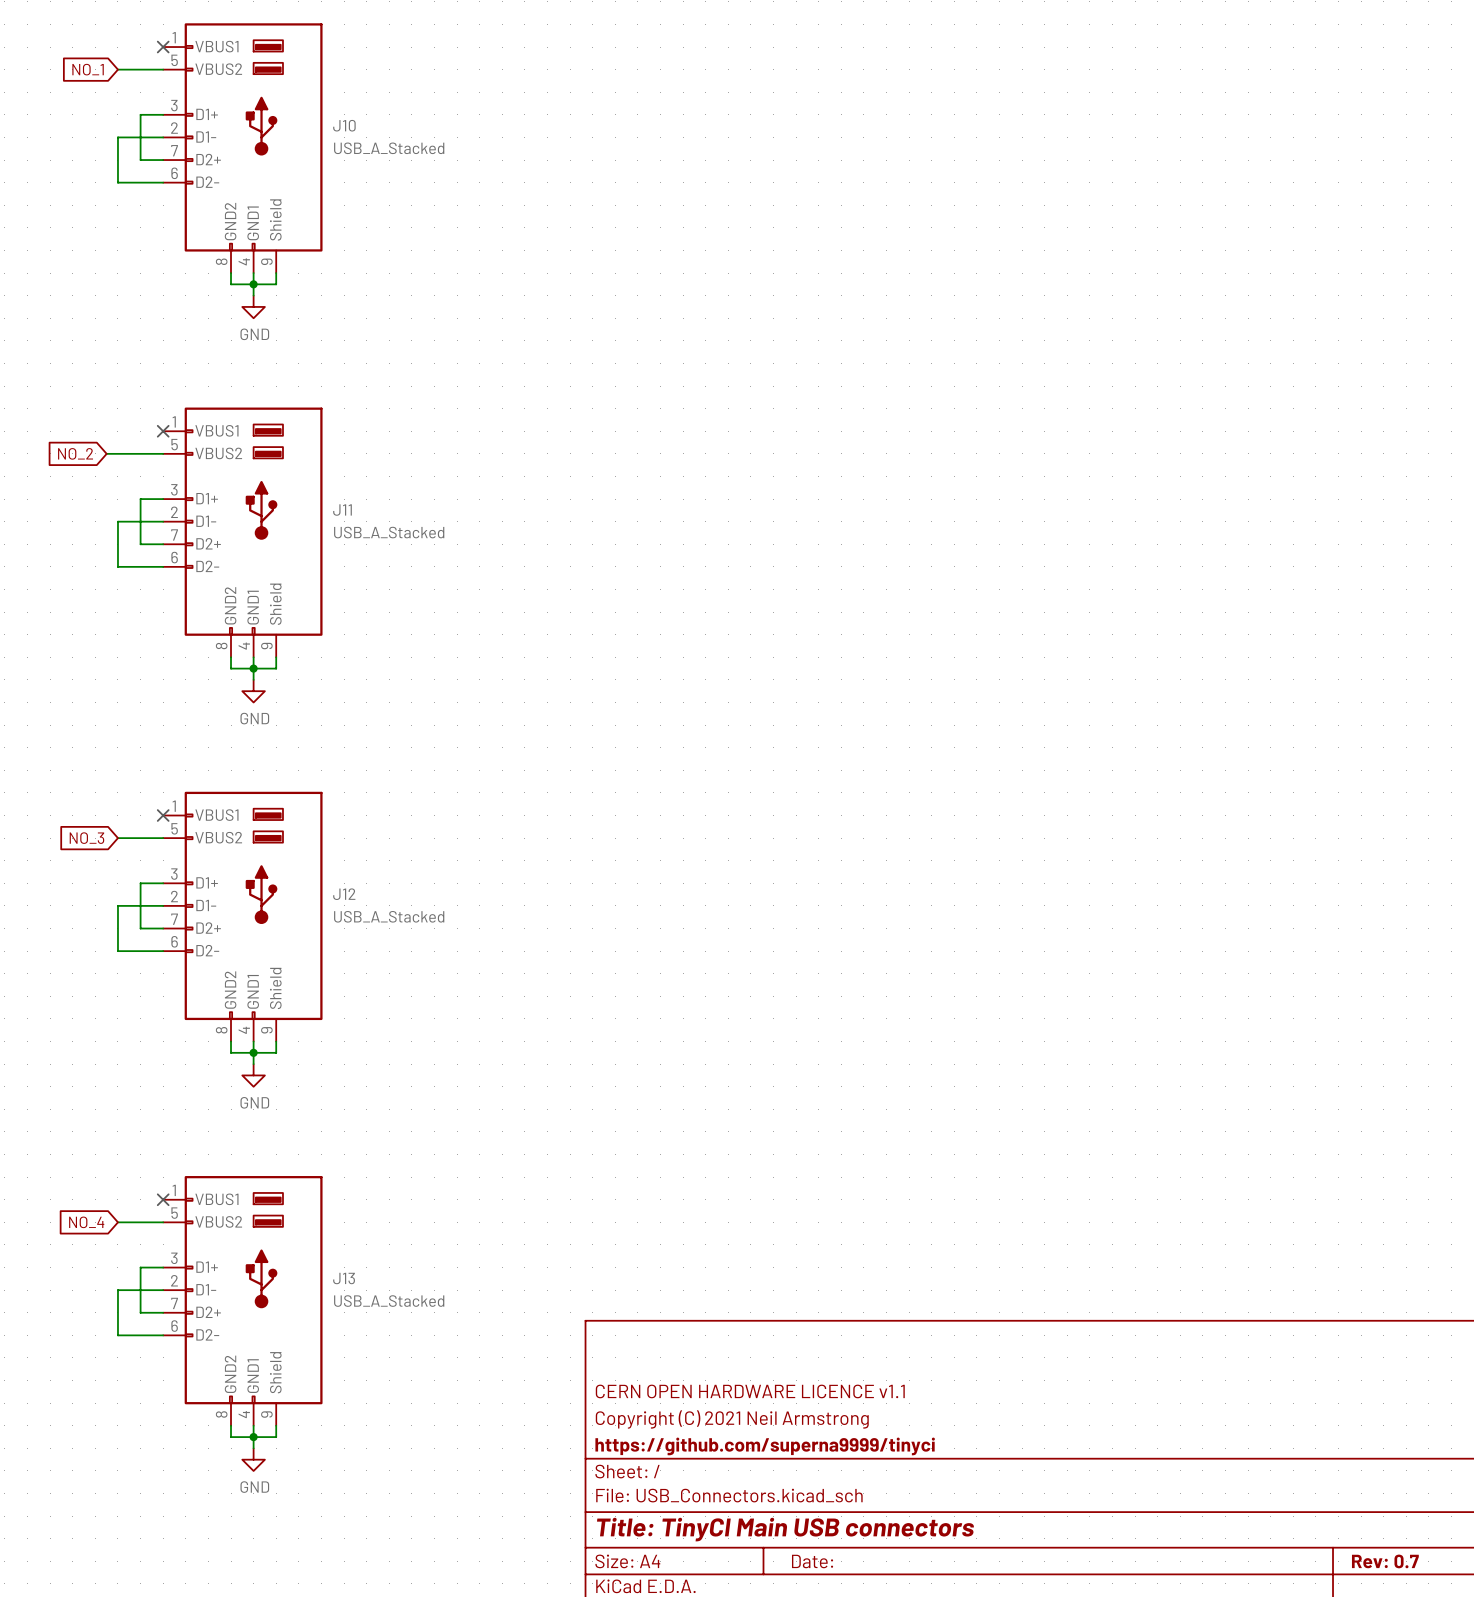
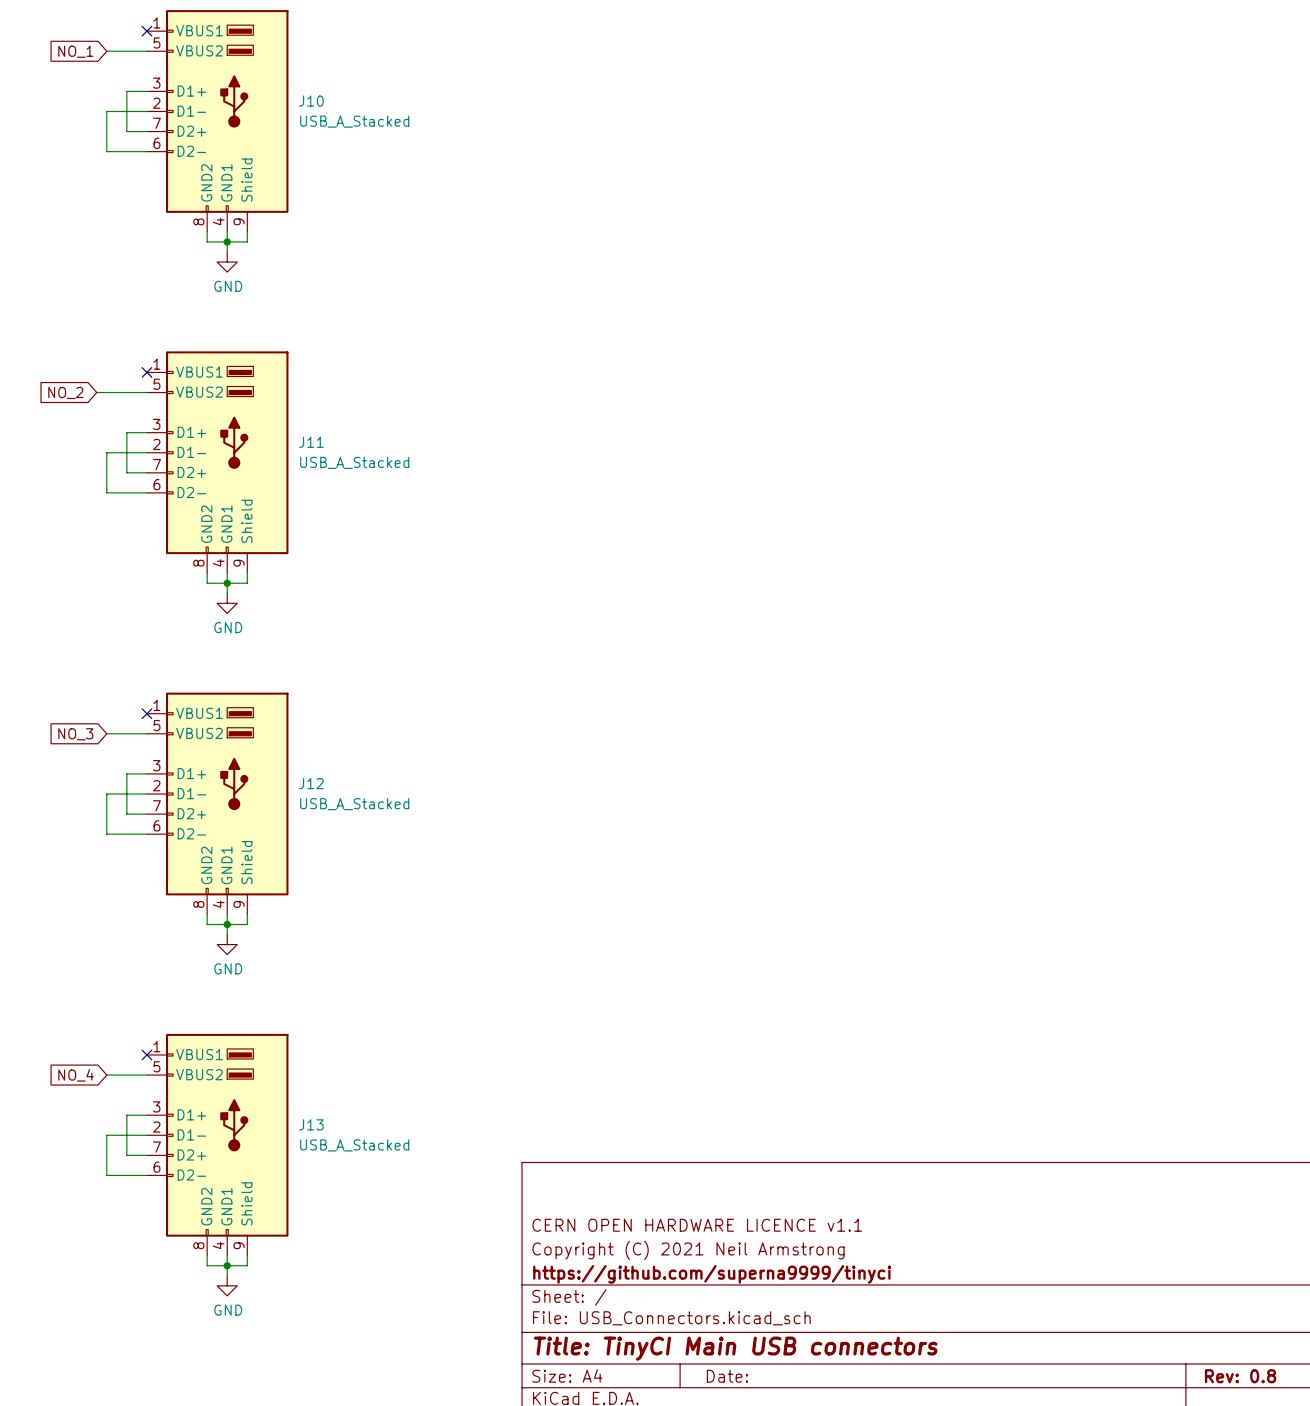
title block: Rev: 0.7 (1385, 1561) -> Rev: 0.8 (1240, 1376)

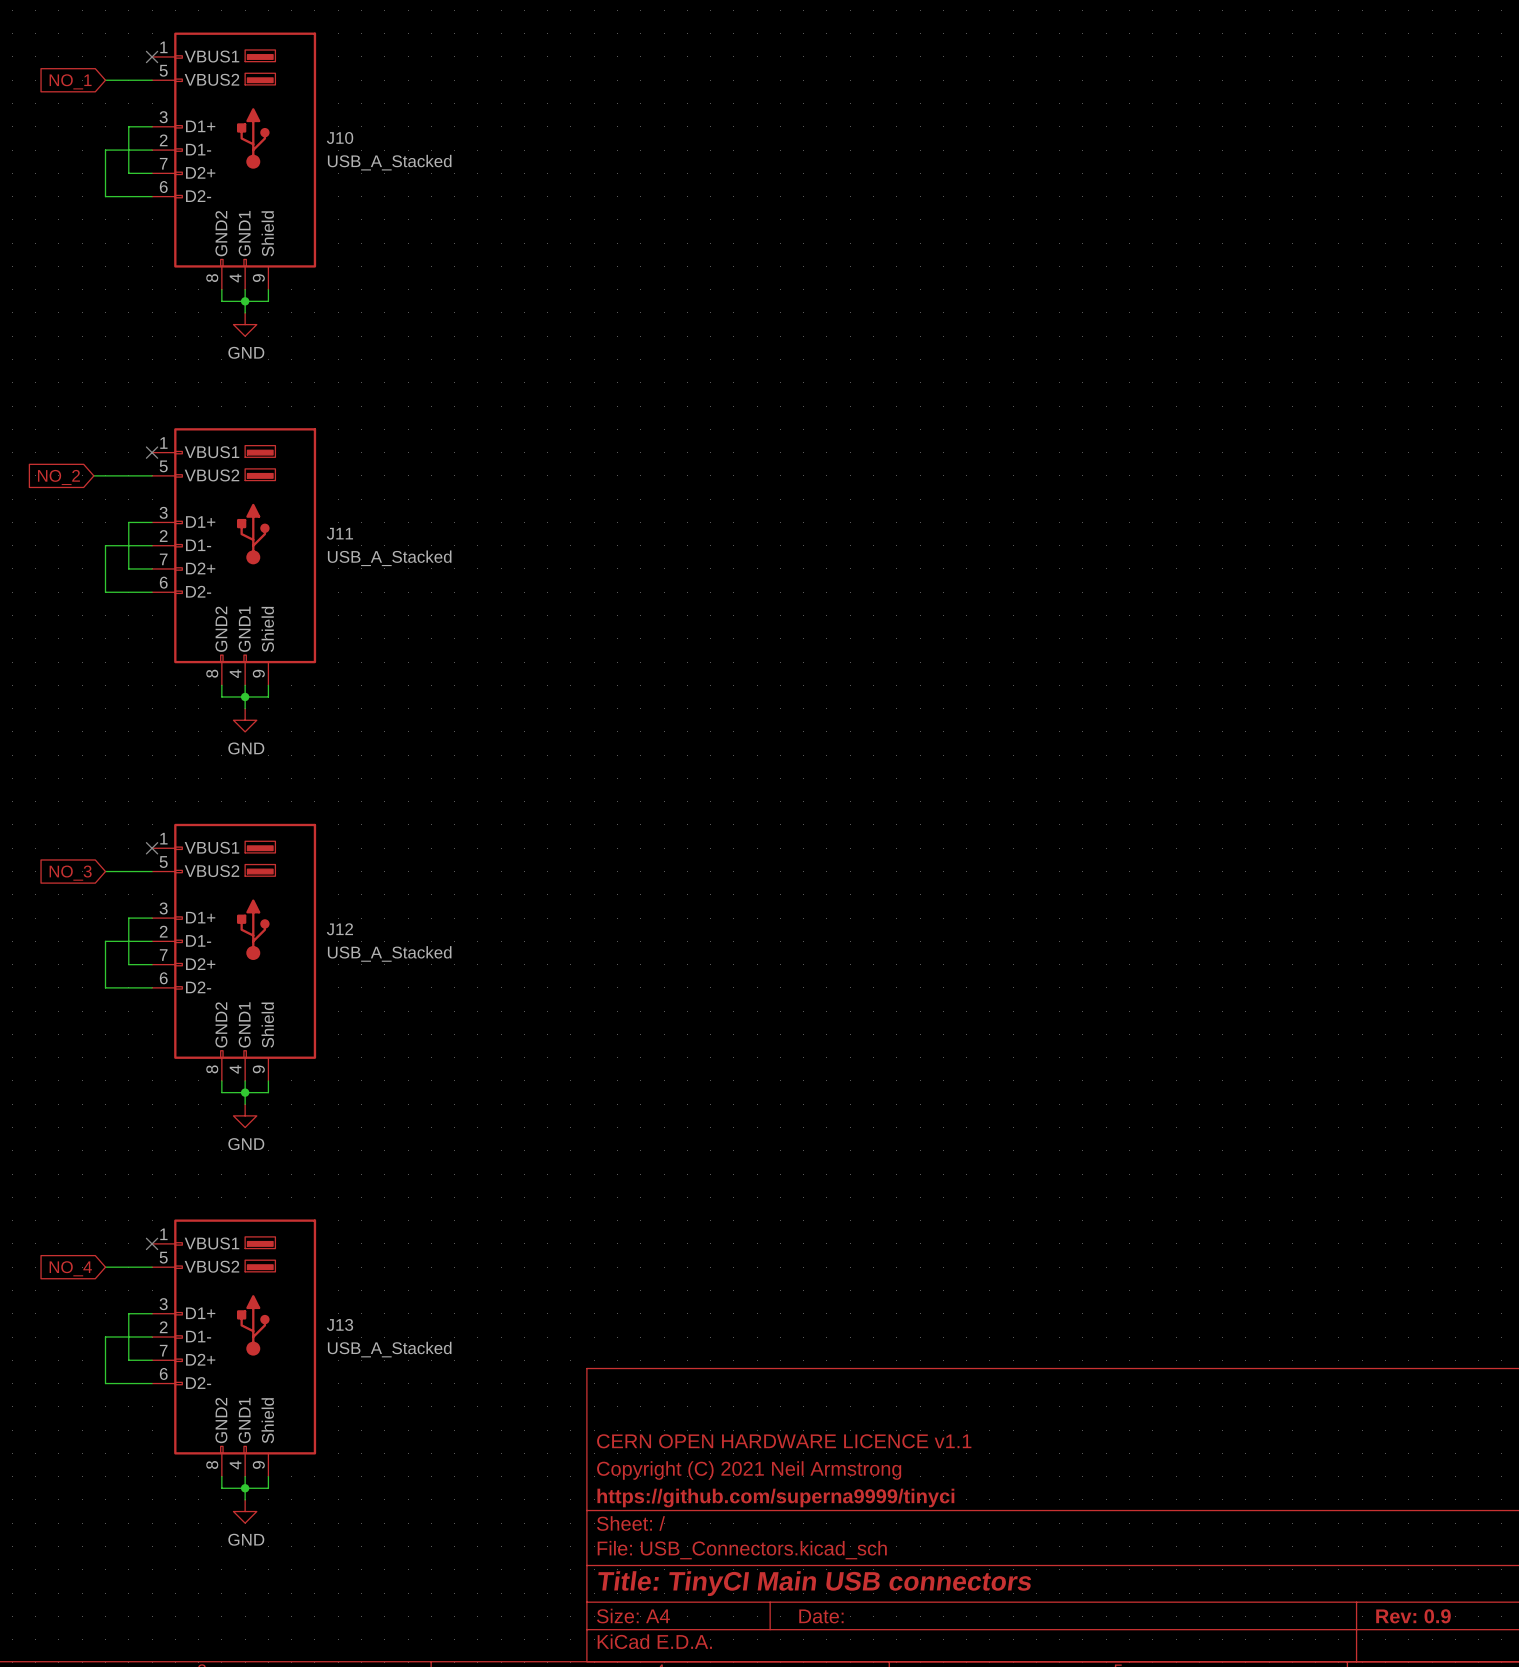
title block: Rev: 0.8 (1240, 1376) -> Rev: 0.9 (1413, 1616)

